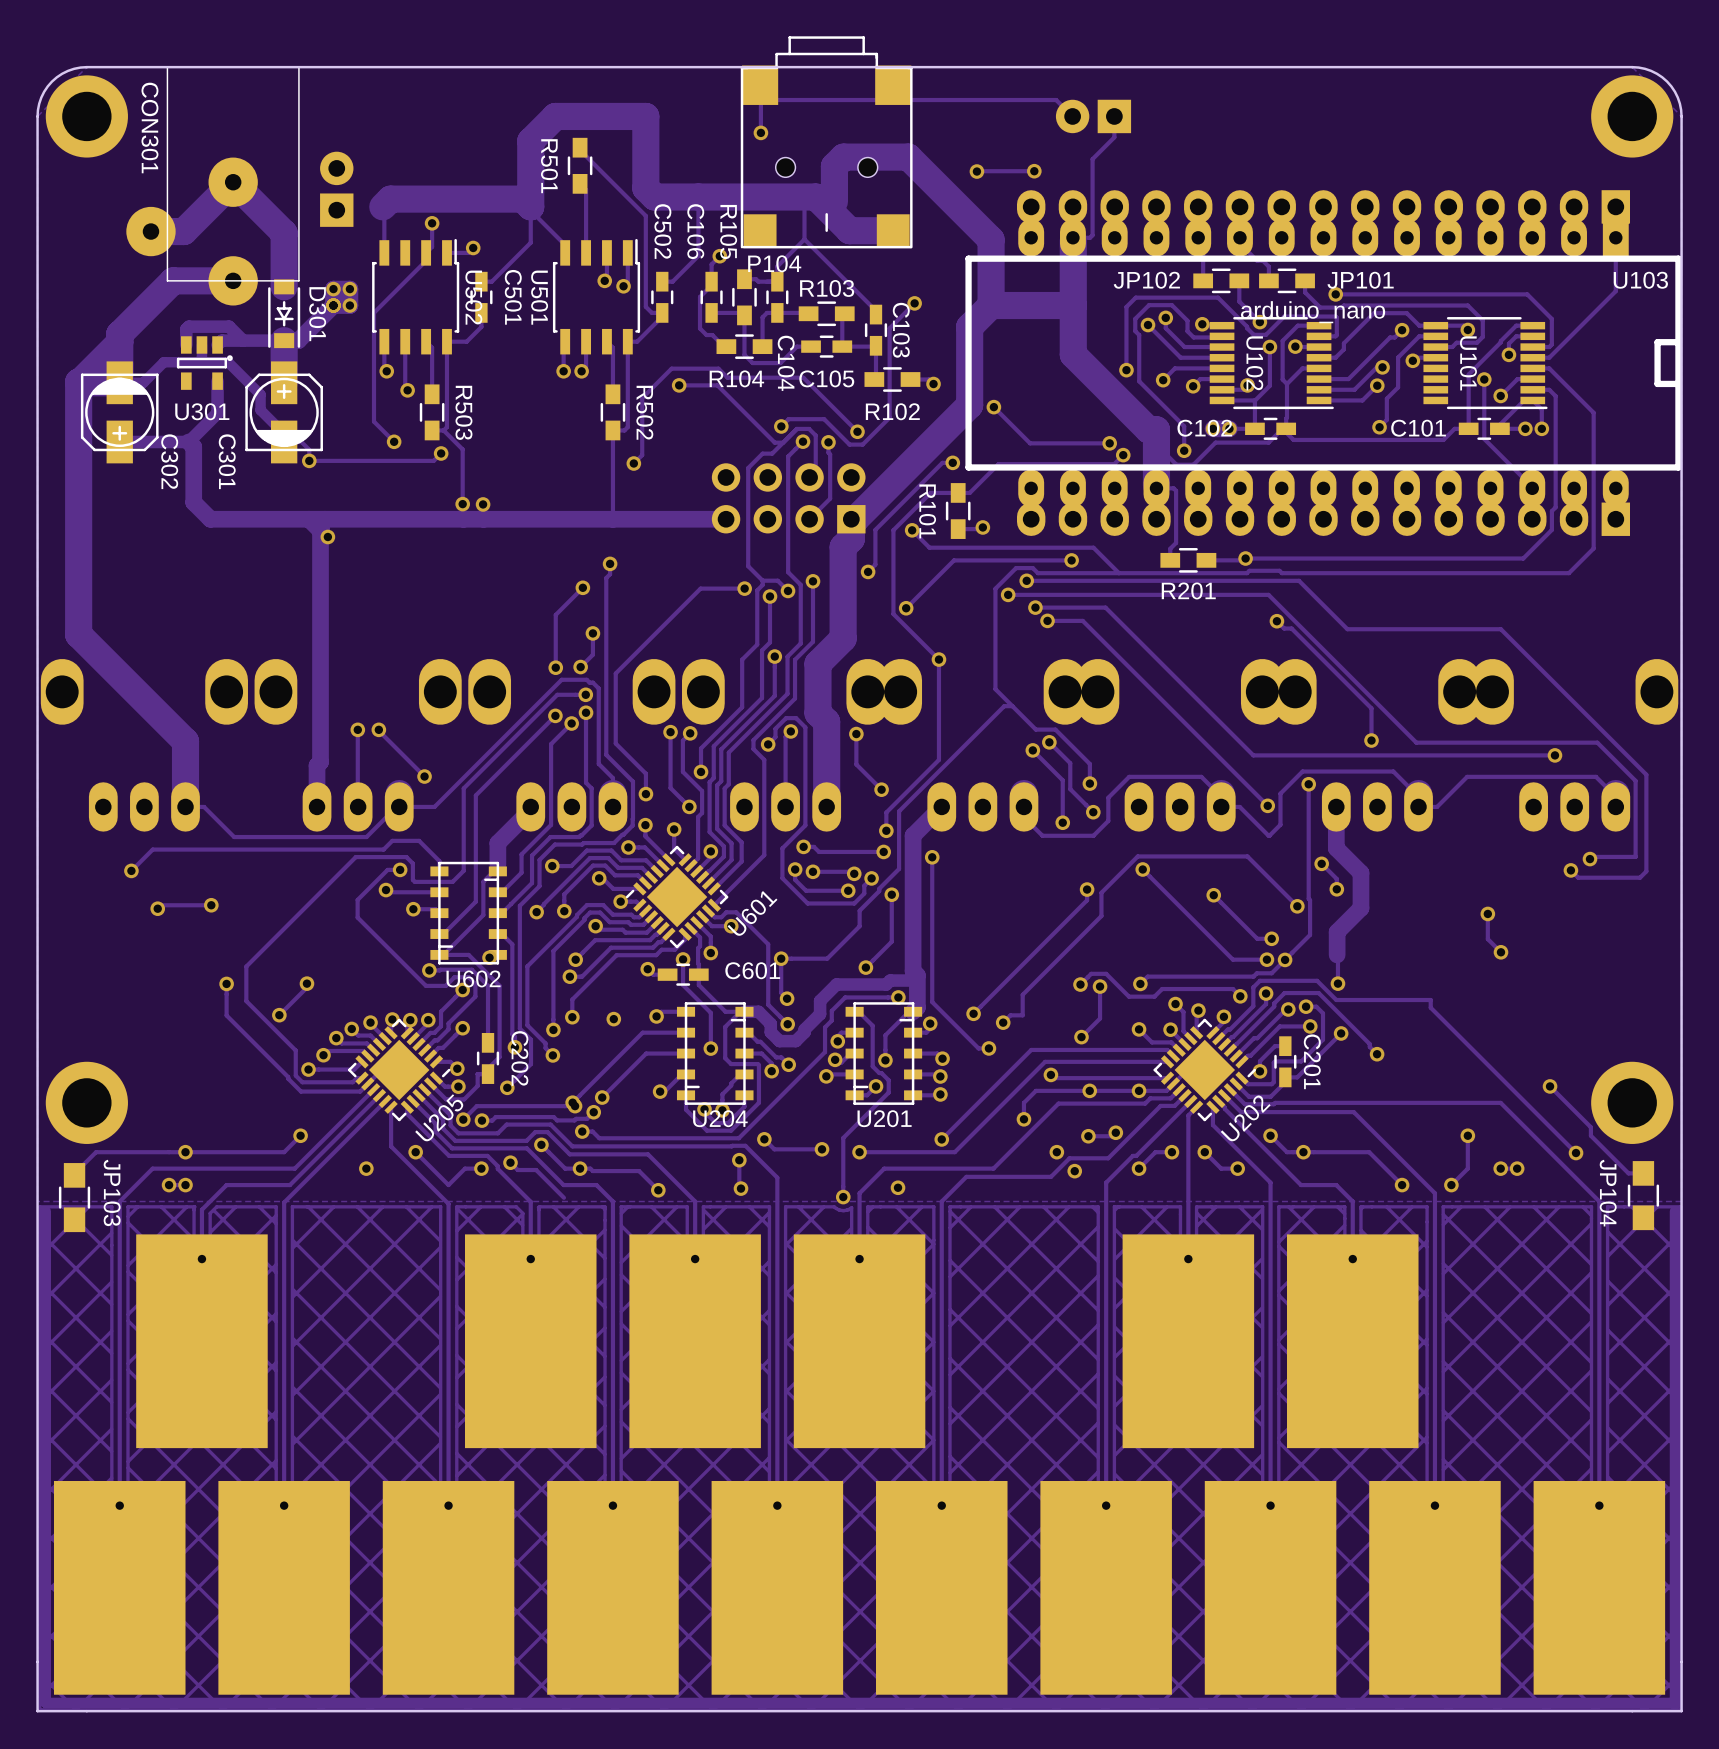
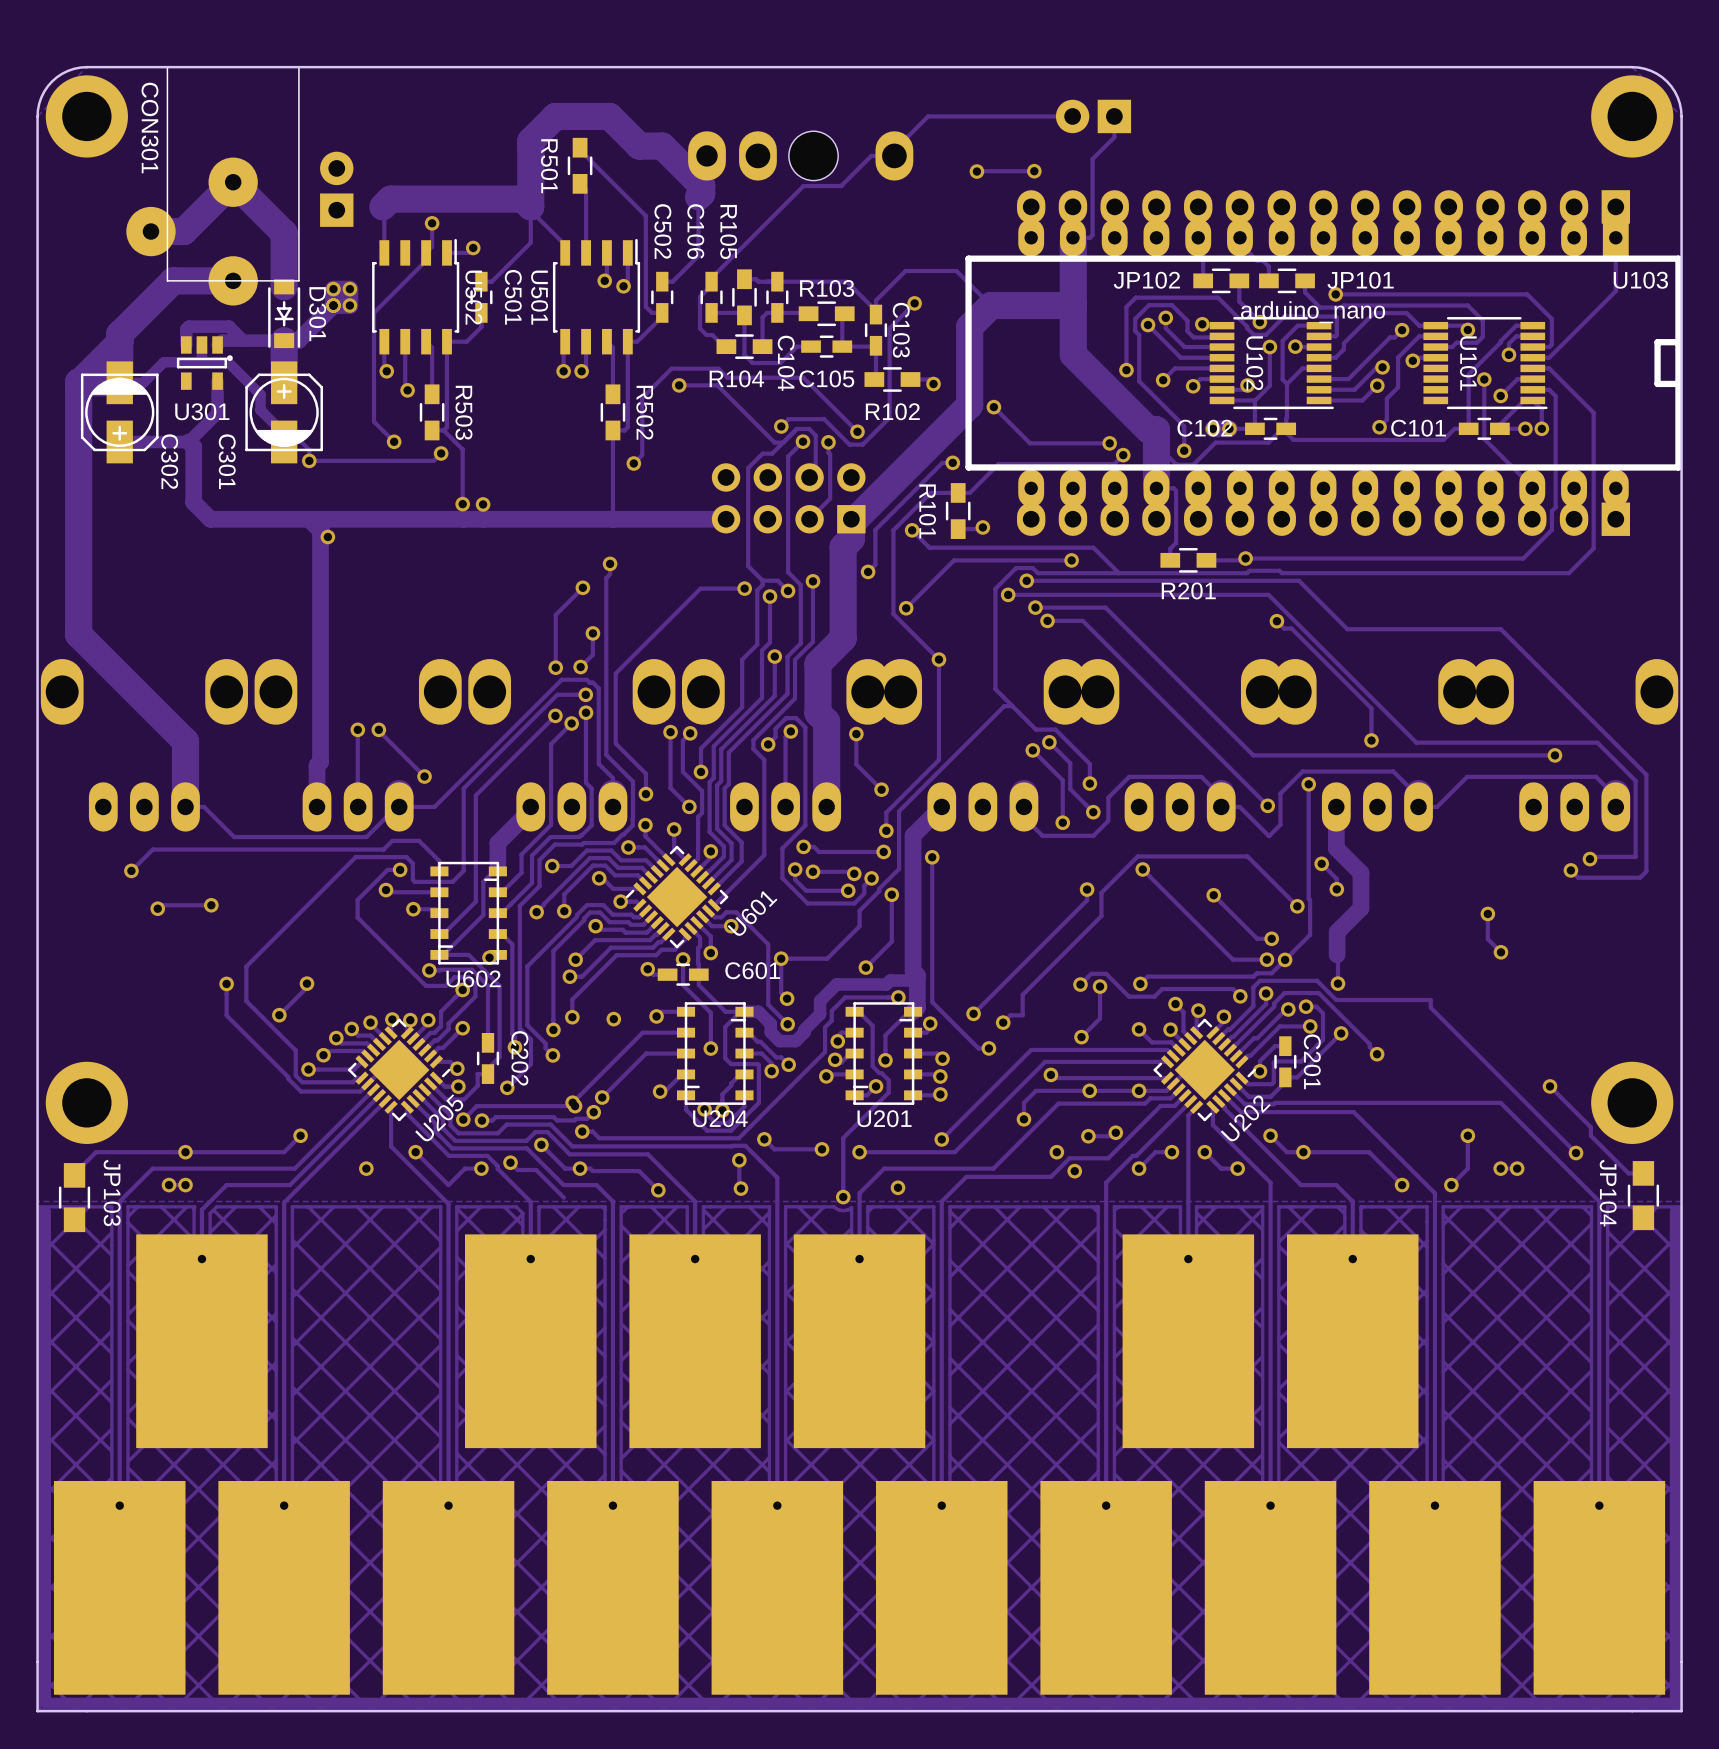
track: (609, 116) (645, 116) (645, 188) (654, 197) (815, 197) -> (609, 116) (639, 146) (662, 146) (701, 185) (701, 193) (698, 197)
track: (1072, 116) (1056, 100) (760, 100) (760, 132) -> (1072, 116) (928, 116) (894, 150) (894, 155) (871, 155) (841, 186) (803, 186) (711, 277)
via: (760, 132) -> none
P104: (826, 142) -> none
part: none -> (800, 155)
track: (815, 197) (804, 208) (804, 239) -> none
track: (815, 197) (849, 230) (893, 230) -> none
track: (834, 201) (834, 166) (843, 157) (908, 157) (991, 239) (991, 305) -> (875, 310) (875, 300) (905, 271) (956, 271) (991, 305)
track: (804, 239) (846, 281) -> (777, 281) (846, 281)
track: (804, 239) (777, 266) (777, 281) -> none
track: (719, 256) (711, 264) (711, 277) -> none
via: (719, 256) -> none

